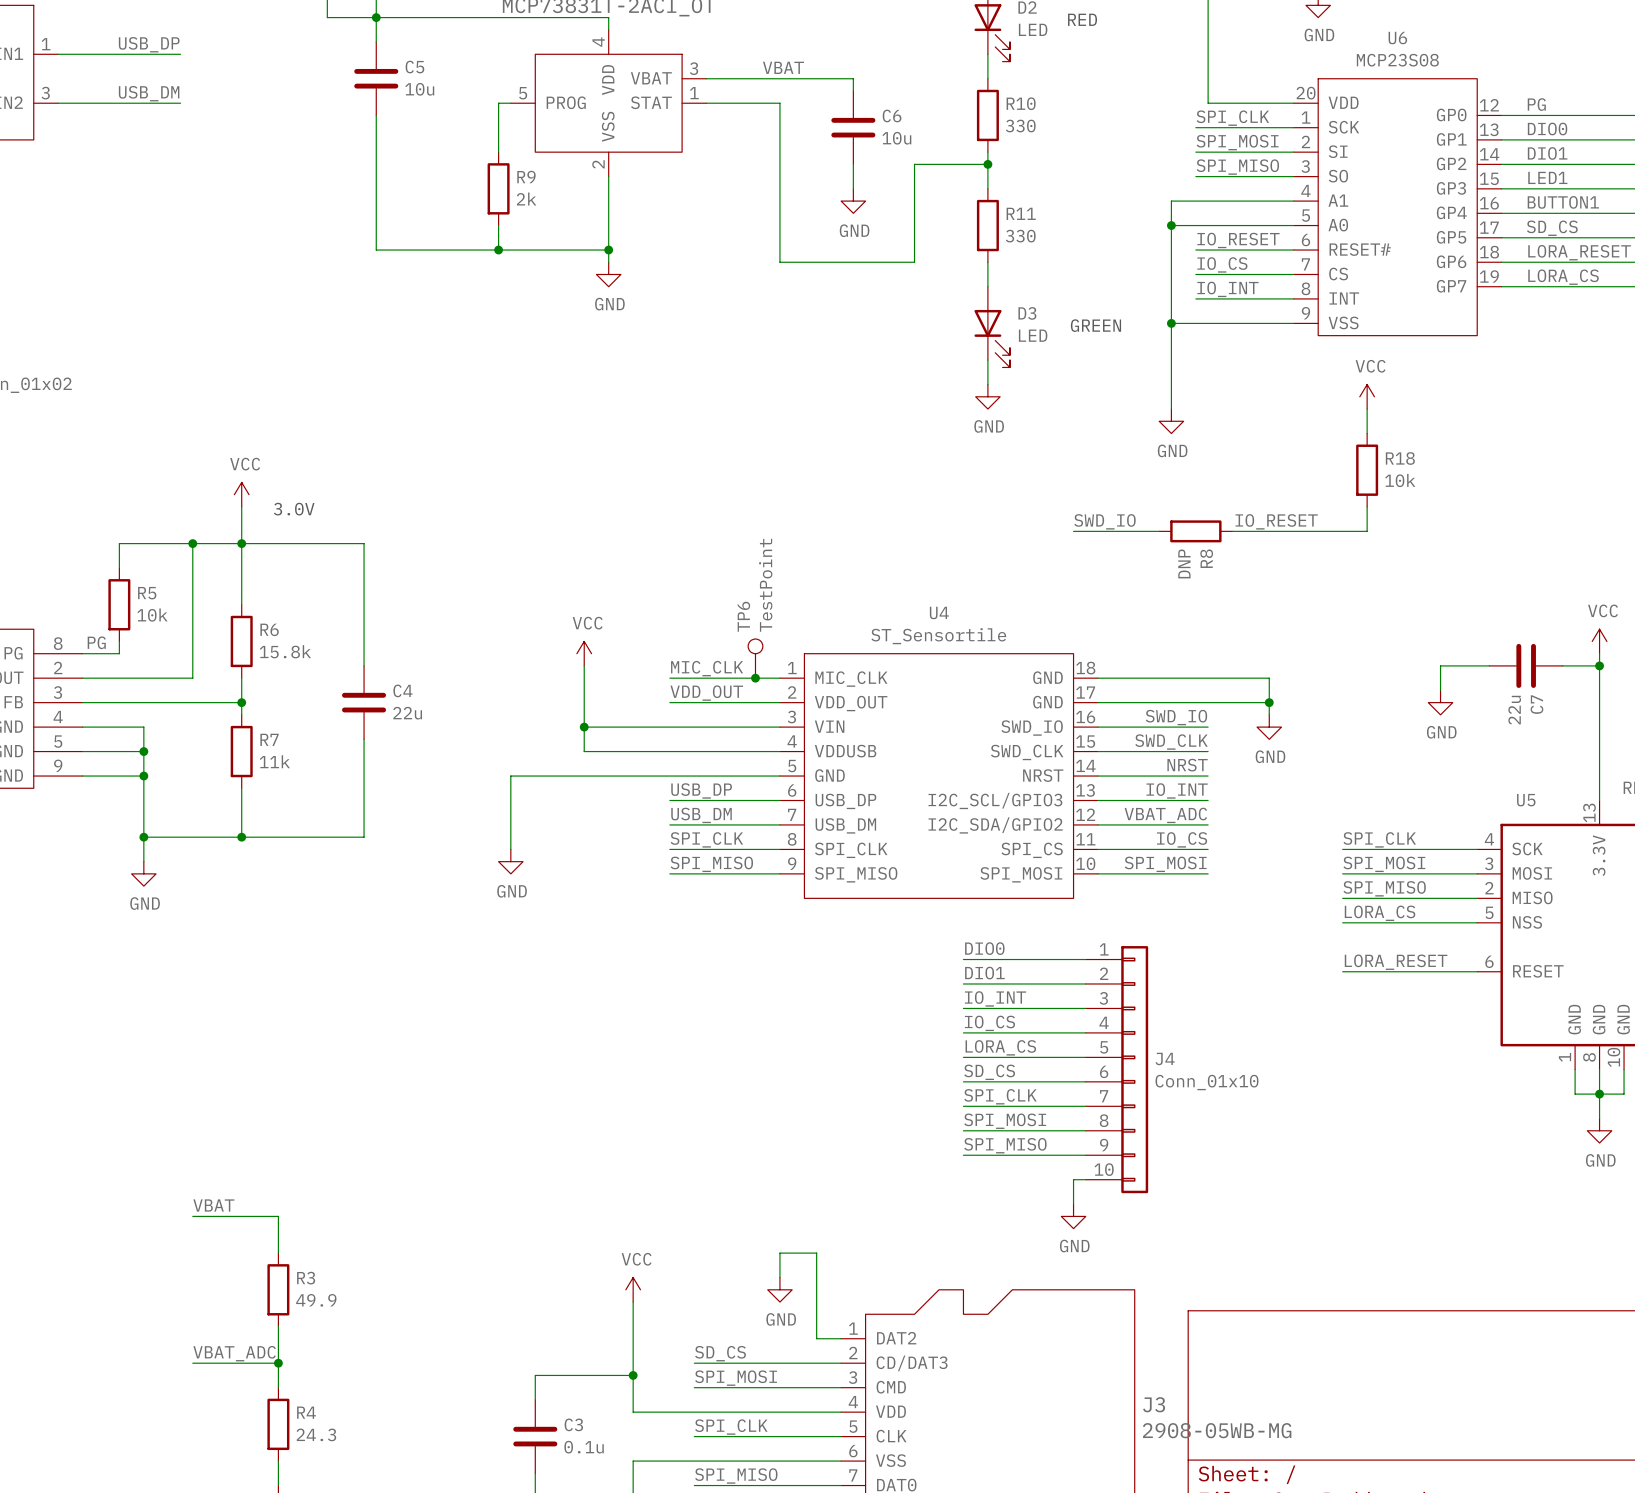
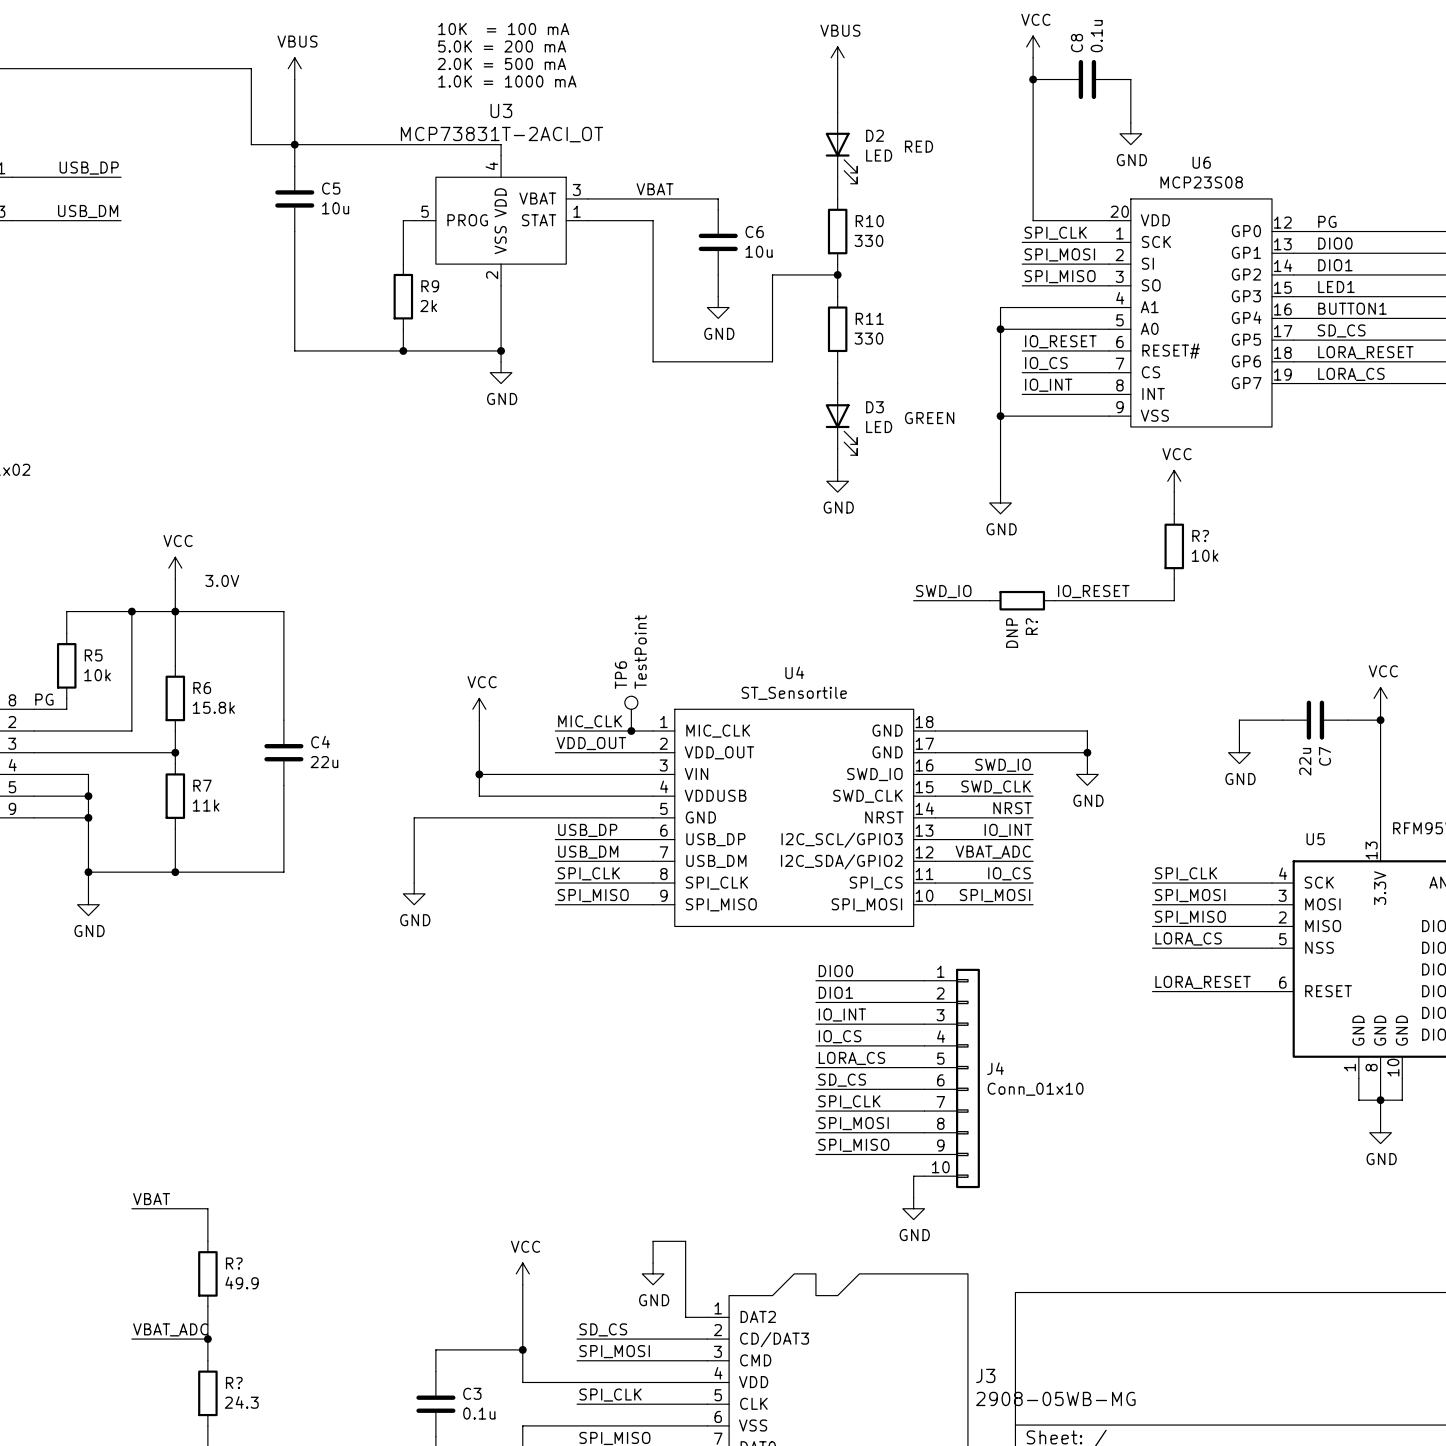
R18 name: R18 (1400, 458) -> R? (1200, 536)
R8 name: R8 (1206, 558) -> R? (1031, 626)
R3 name: R3 (306, 1278) -> R? (234, 1263)
R4 name: R4 (306, 1412) -> R? (234, 1382)

